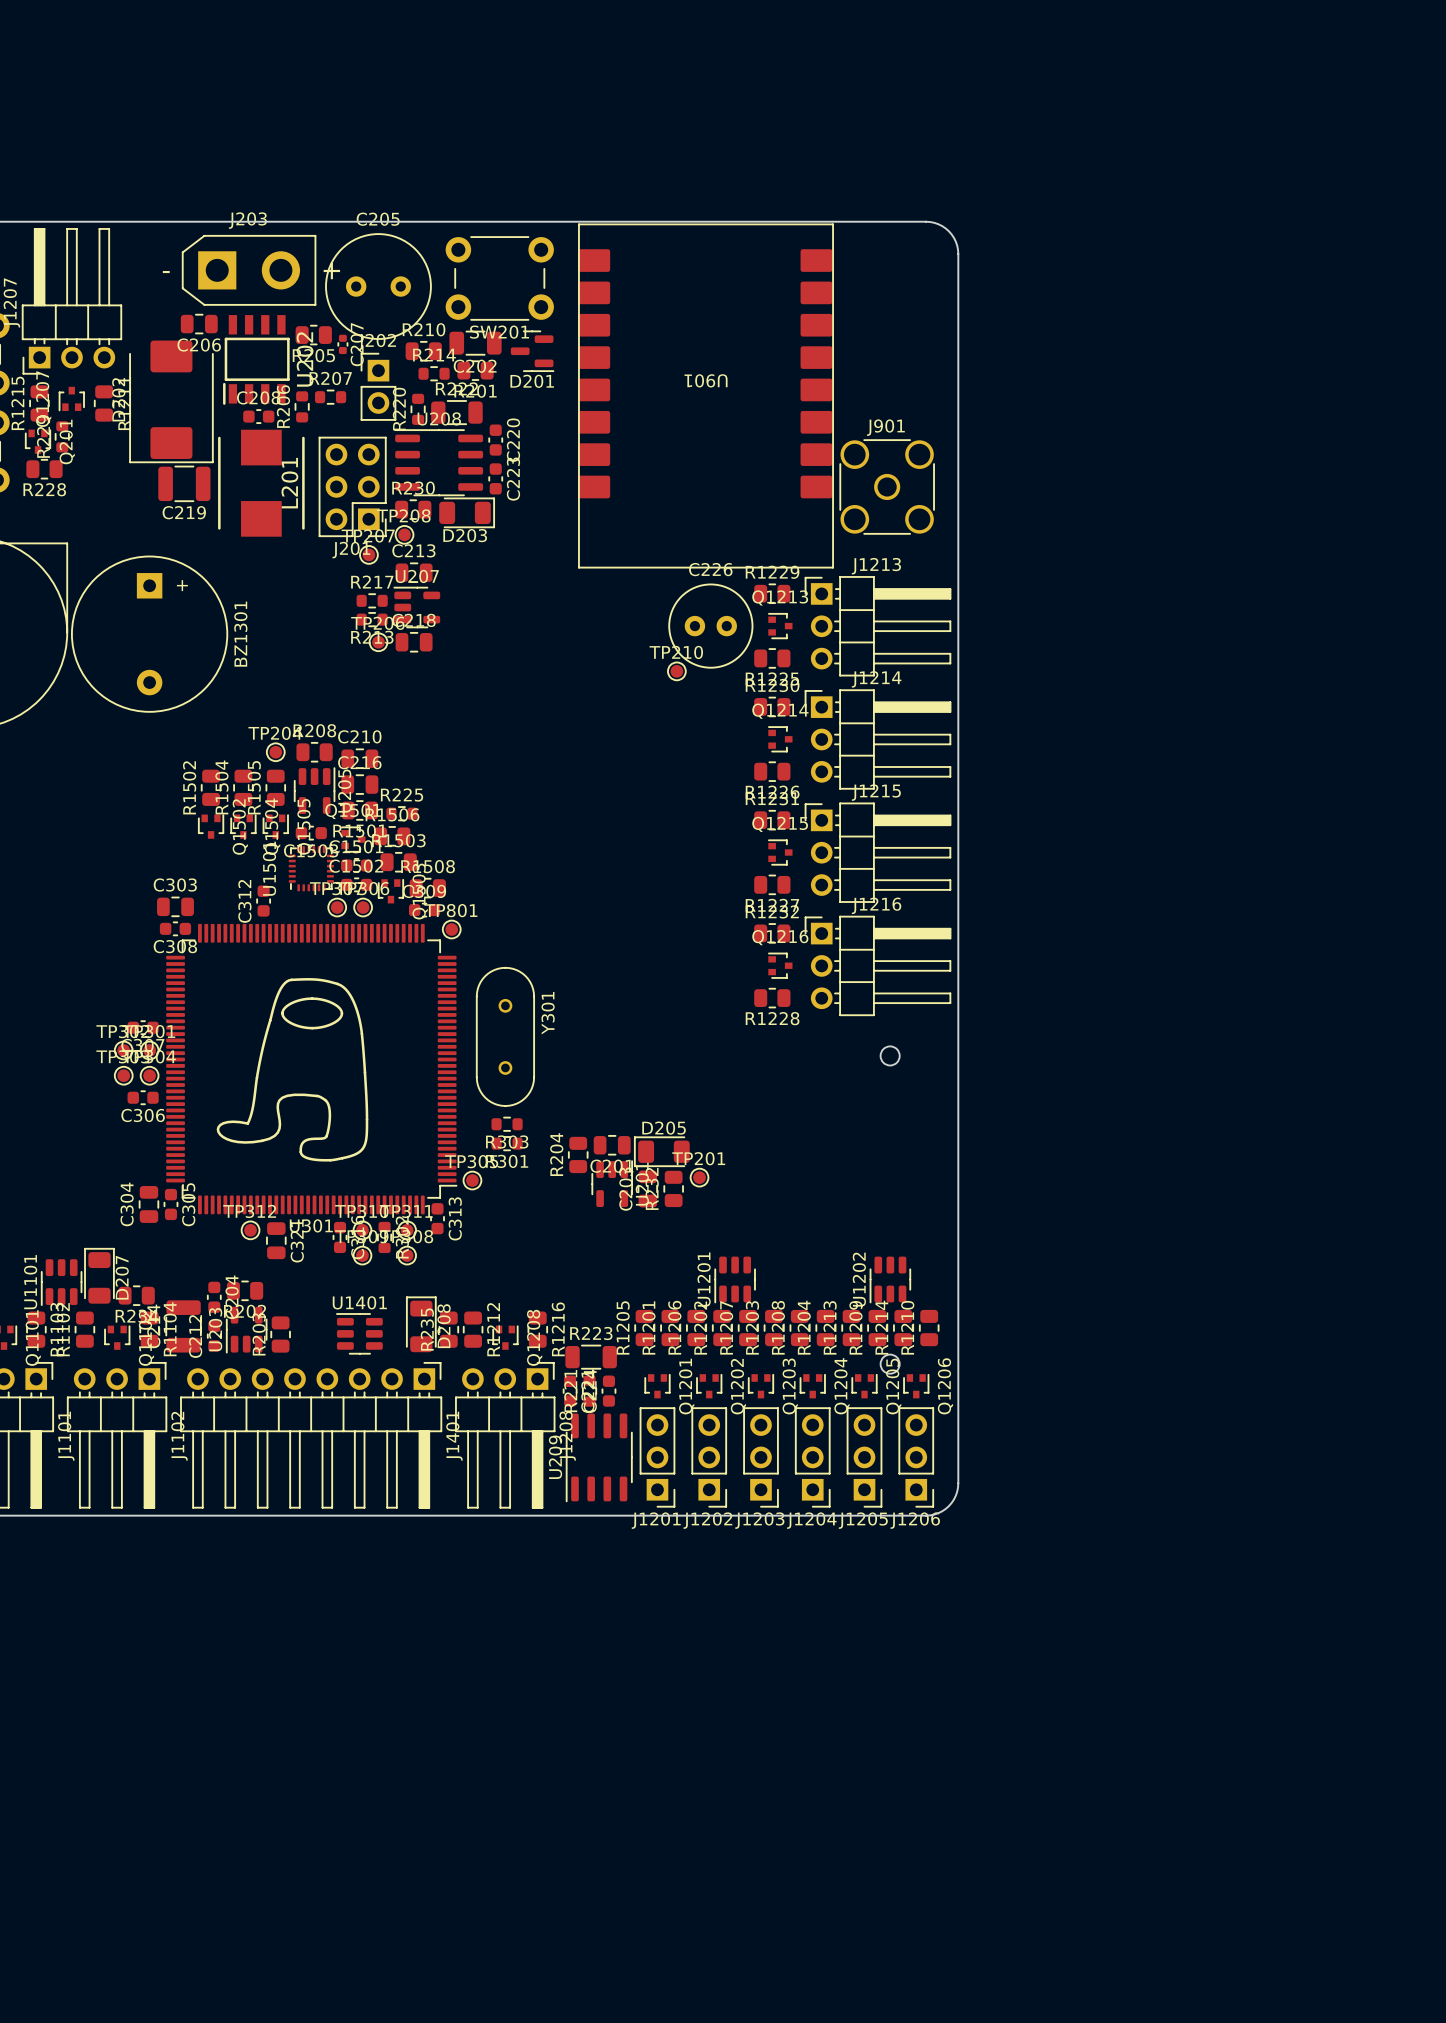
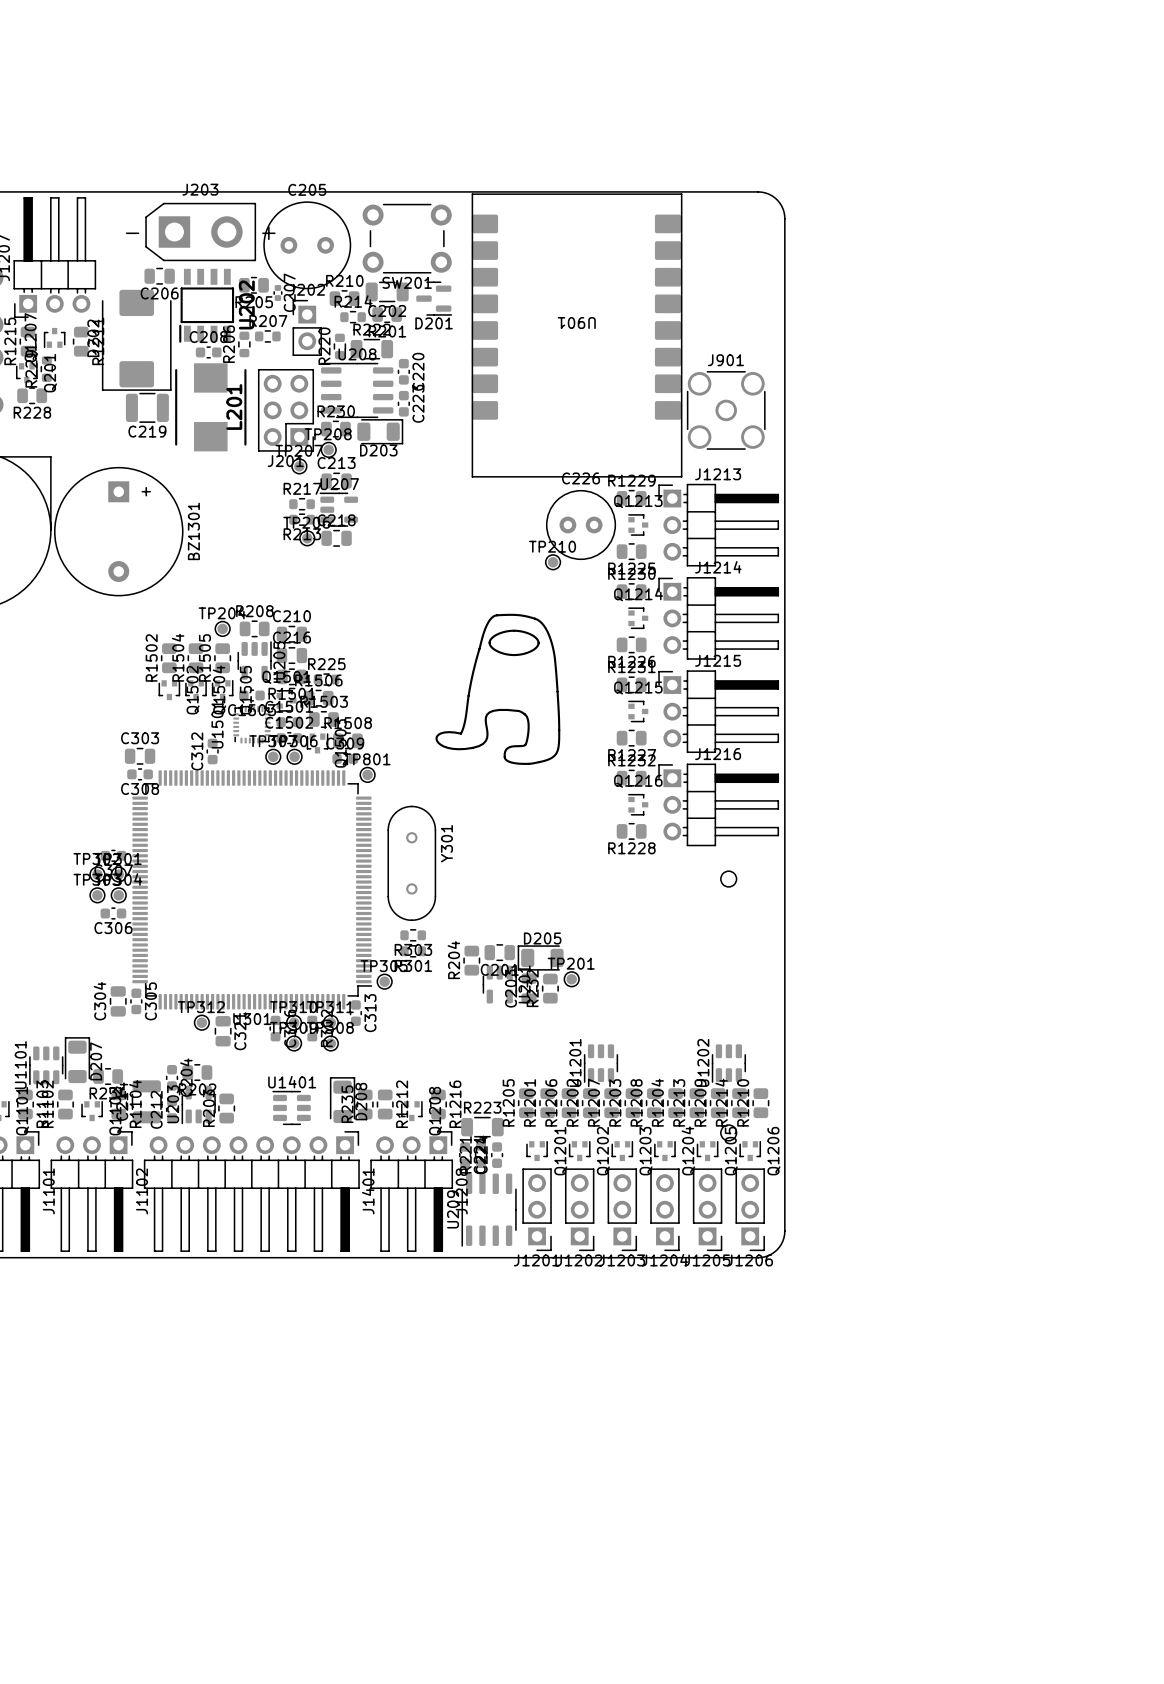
drawing: none -> [435, 613, 561, 765]
drawing: [216, 978, 369, 1162] -> none

